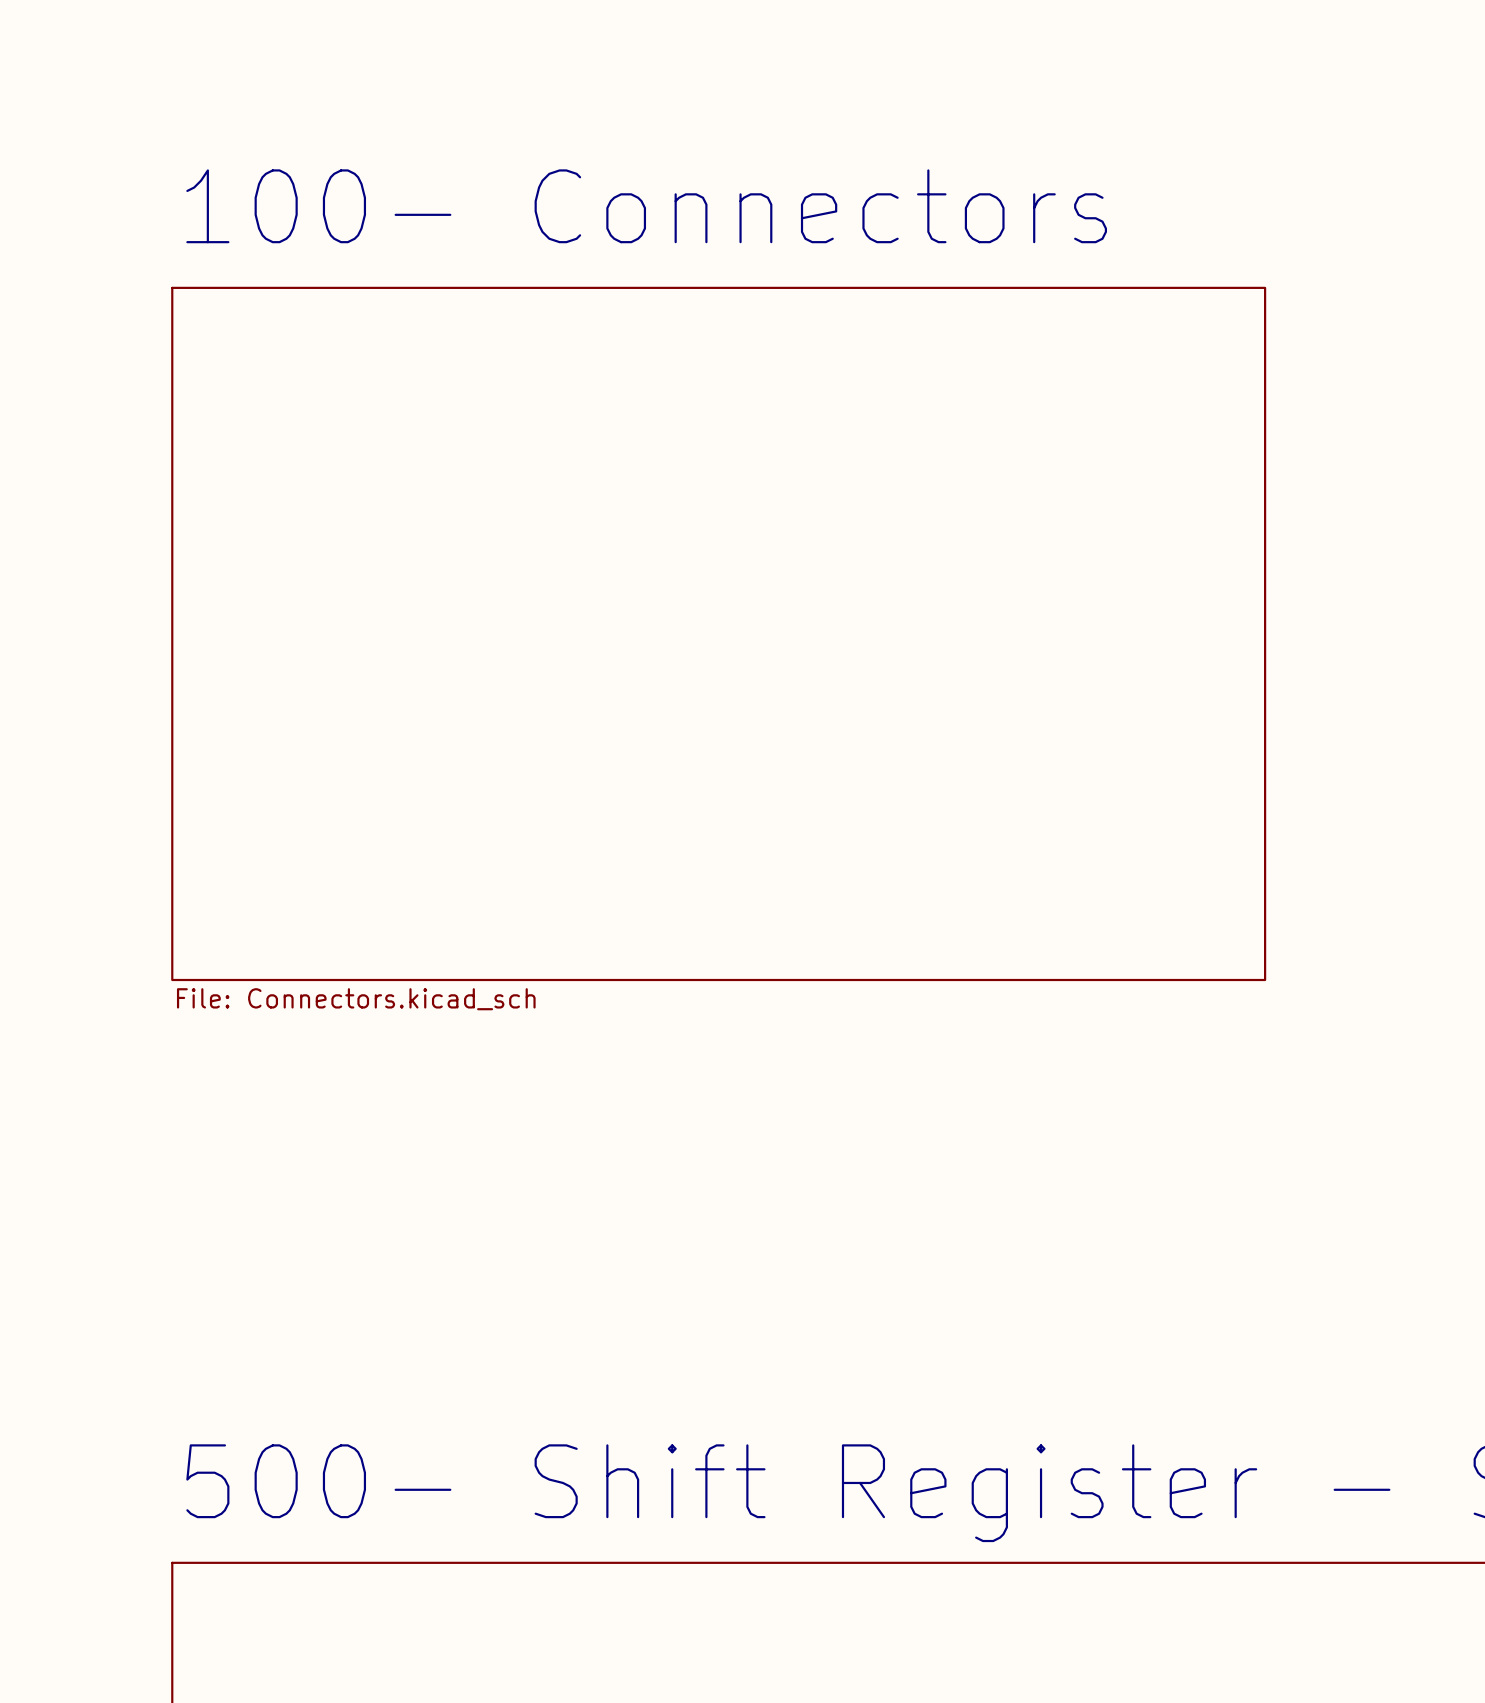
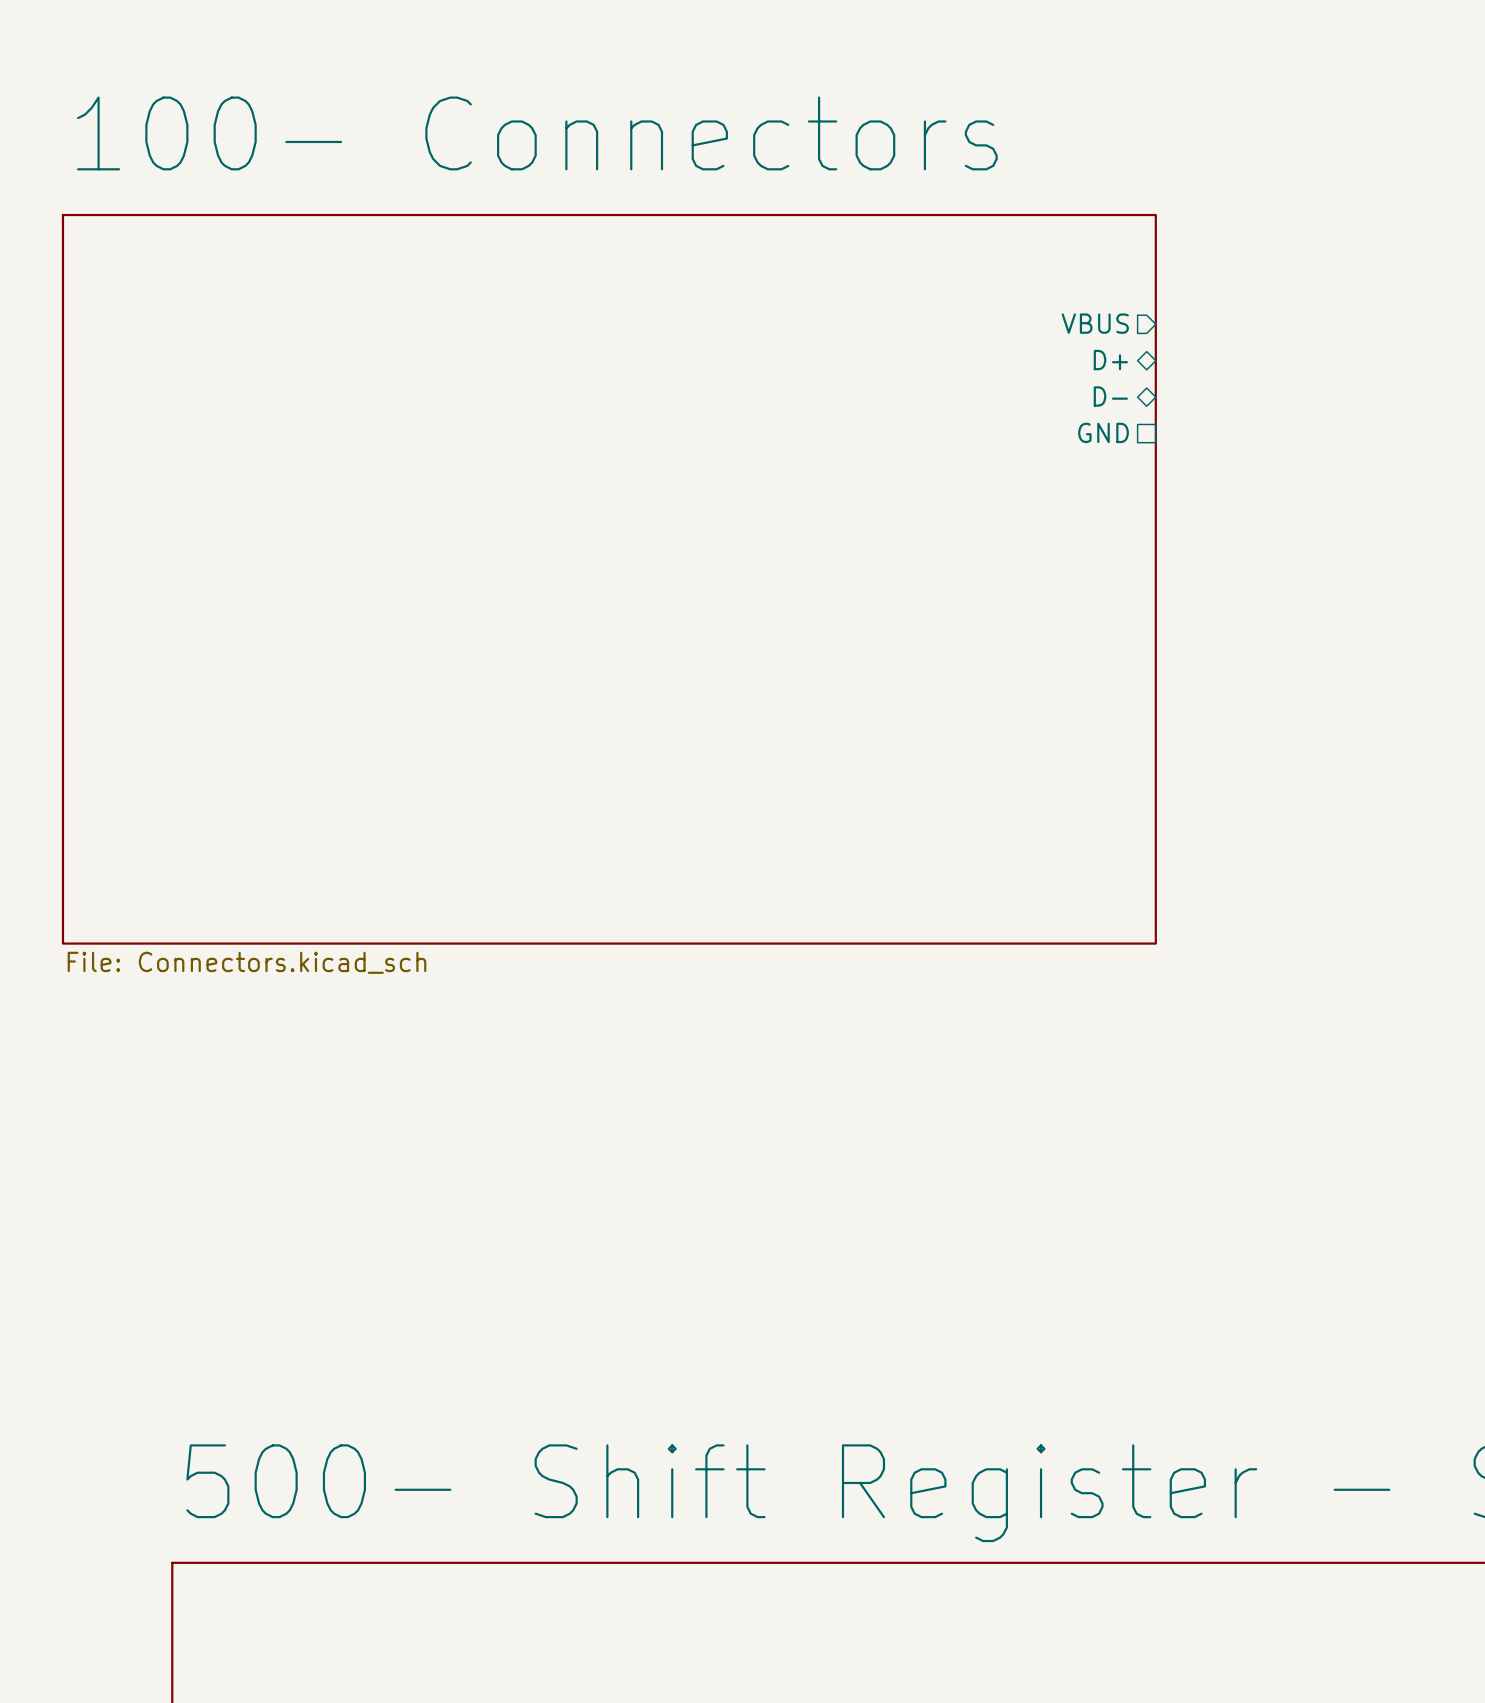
sheet 100- Connectors shape: [171, 286, 1267, 982] -> [61, 213, 1157, 945]
sheet pin: none -> VBUS (1095, 323)
sheet pin: none -> D+ (1110, 360)
sheet pin: none -> D- (1110, 396)
sheet pin: none -> GND (1103, 432)

